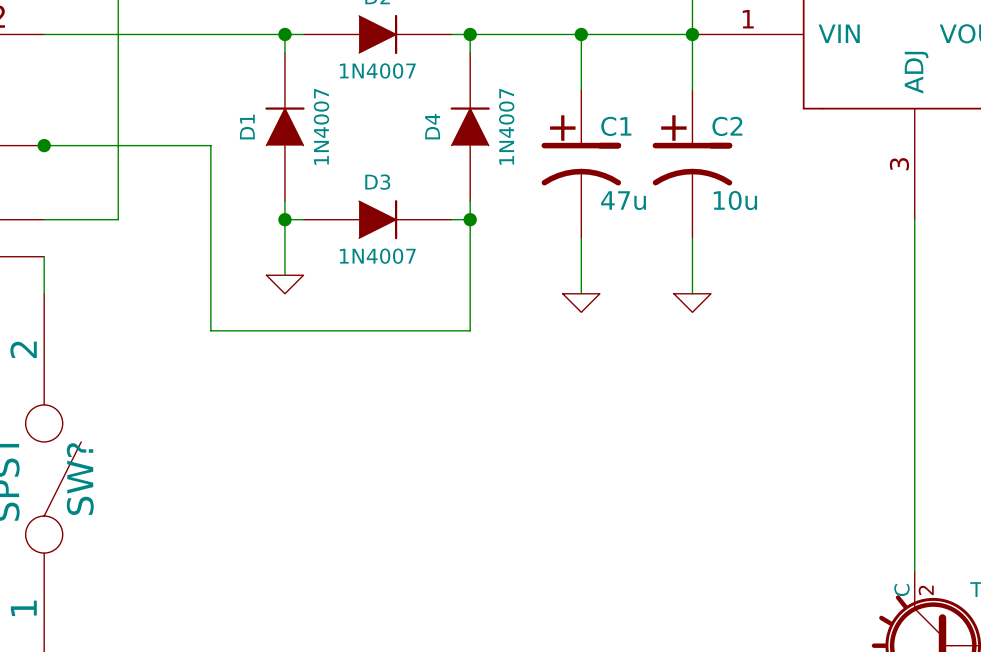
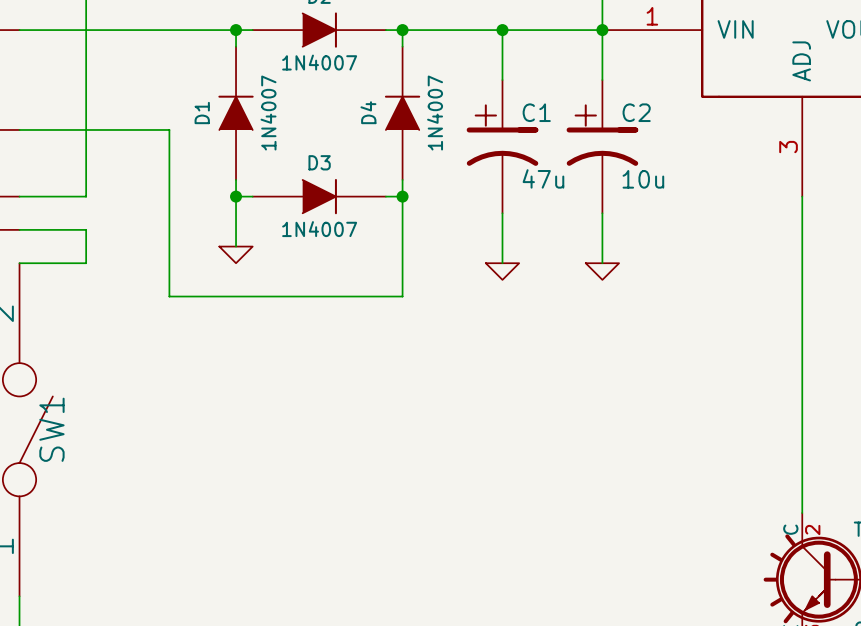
junction: (44, 145) -> none
wire: (44, 256) (44, 293) -> (19, 229) (86, 229) (86, 263) (19, 263)
SW? name: SW? (80, 479) -> SW1 (51, 429)

